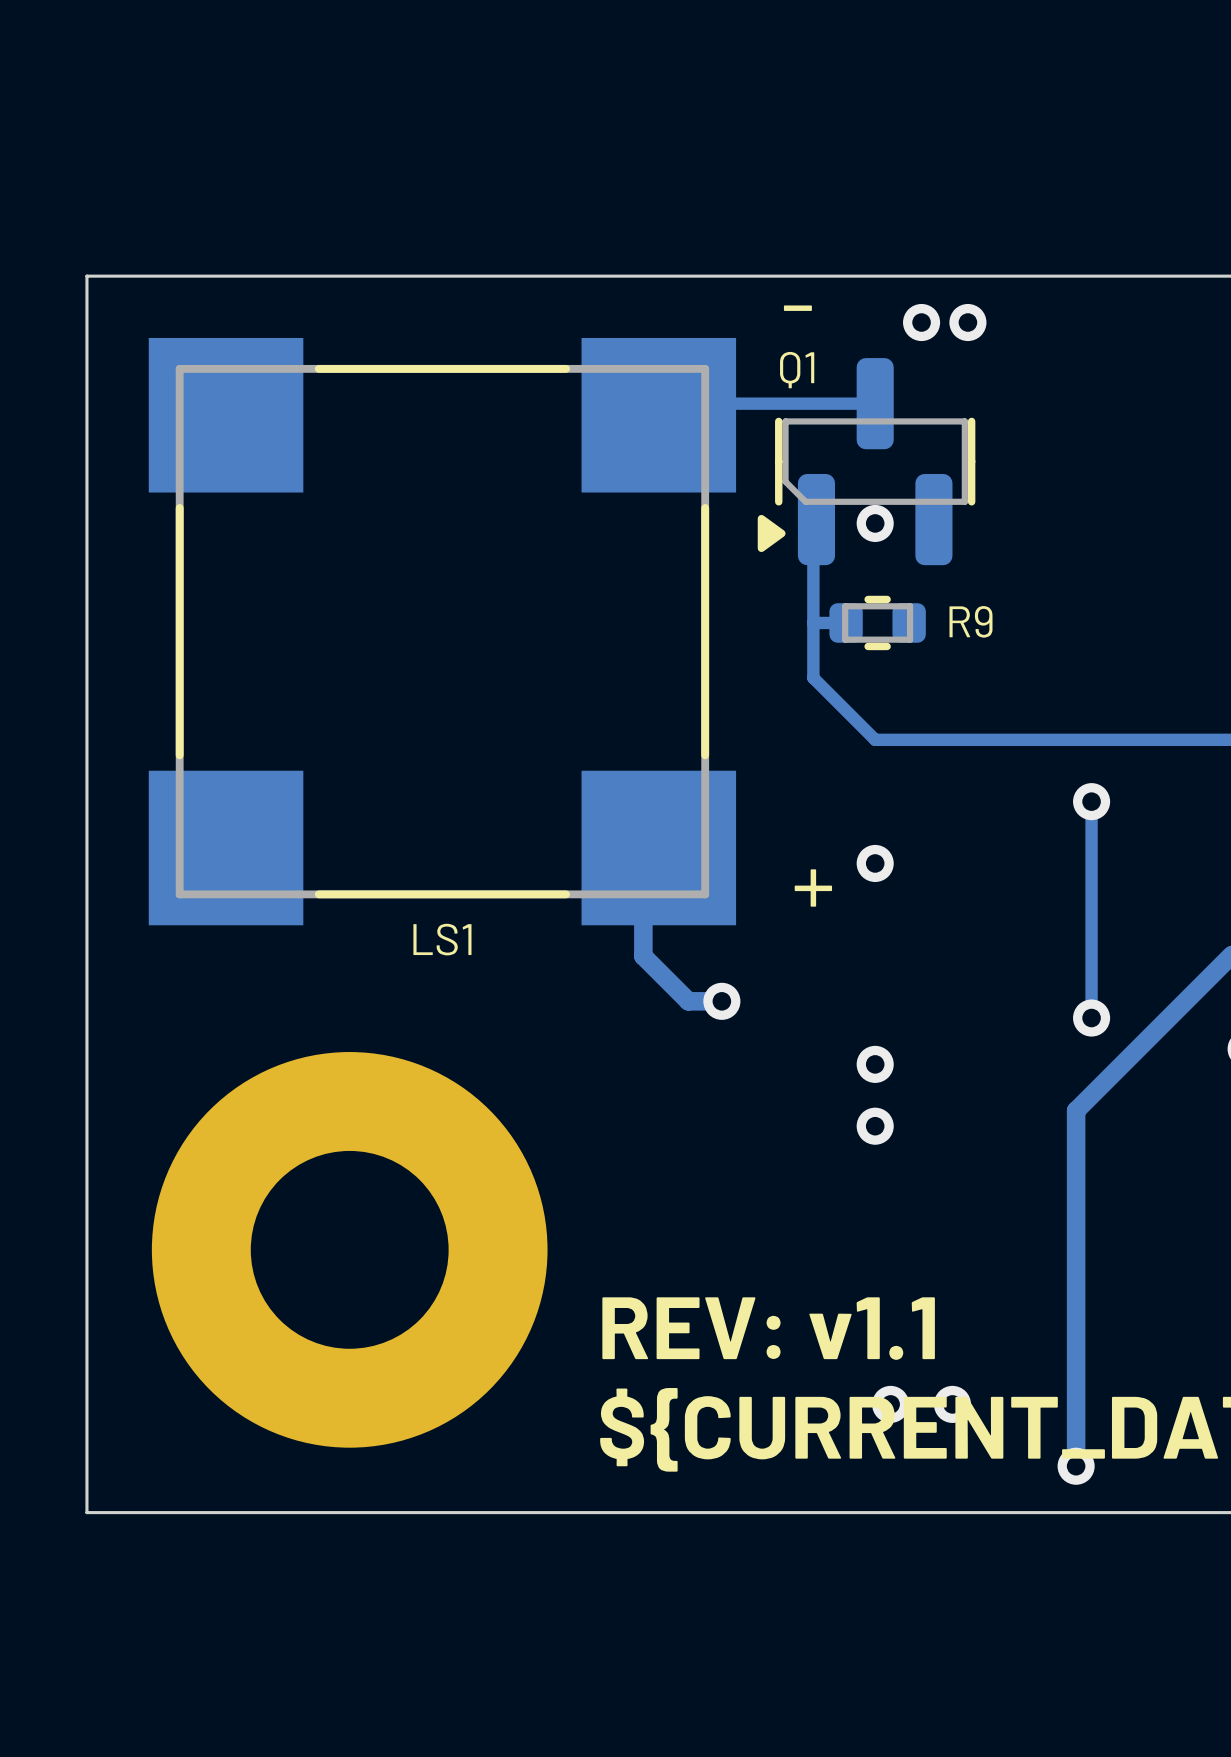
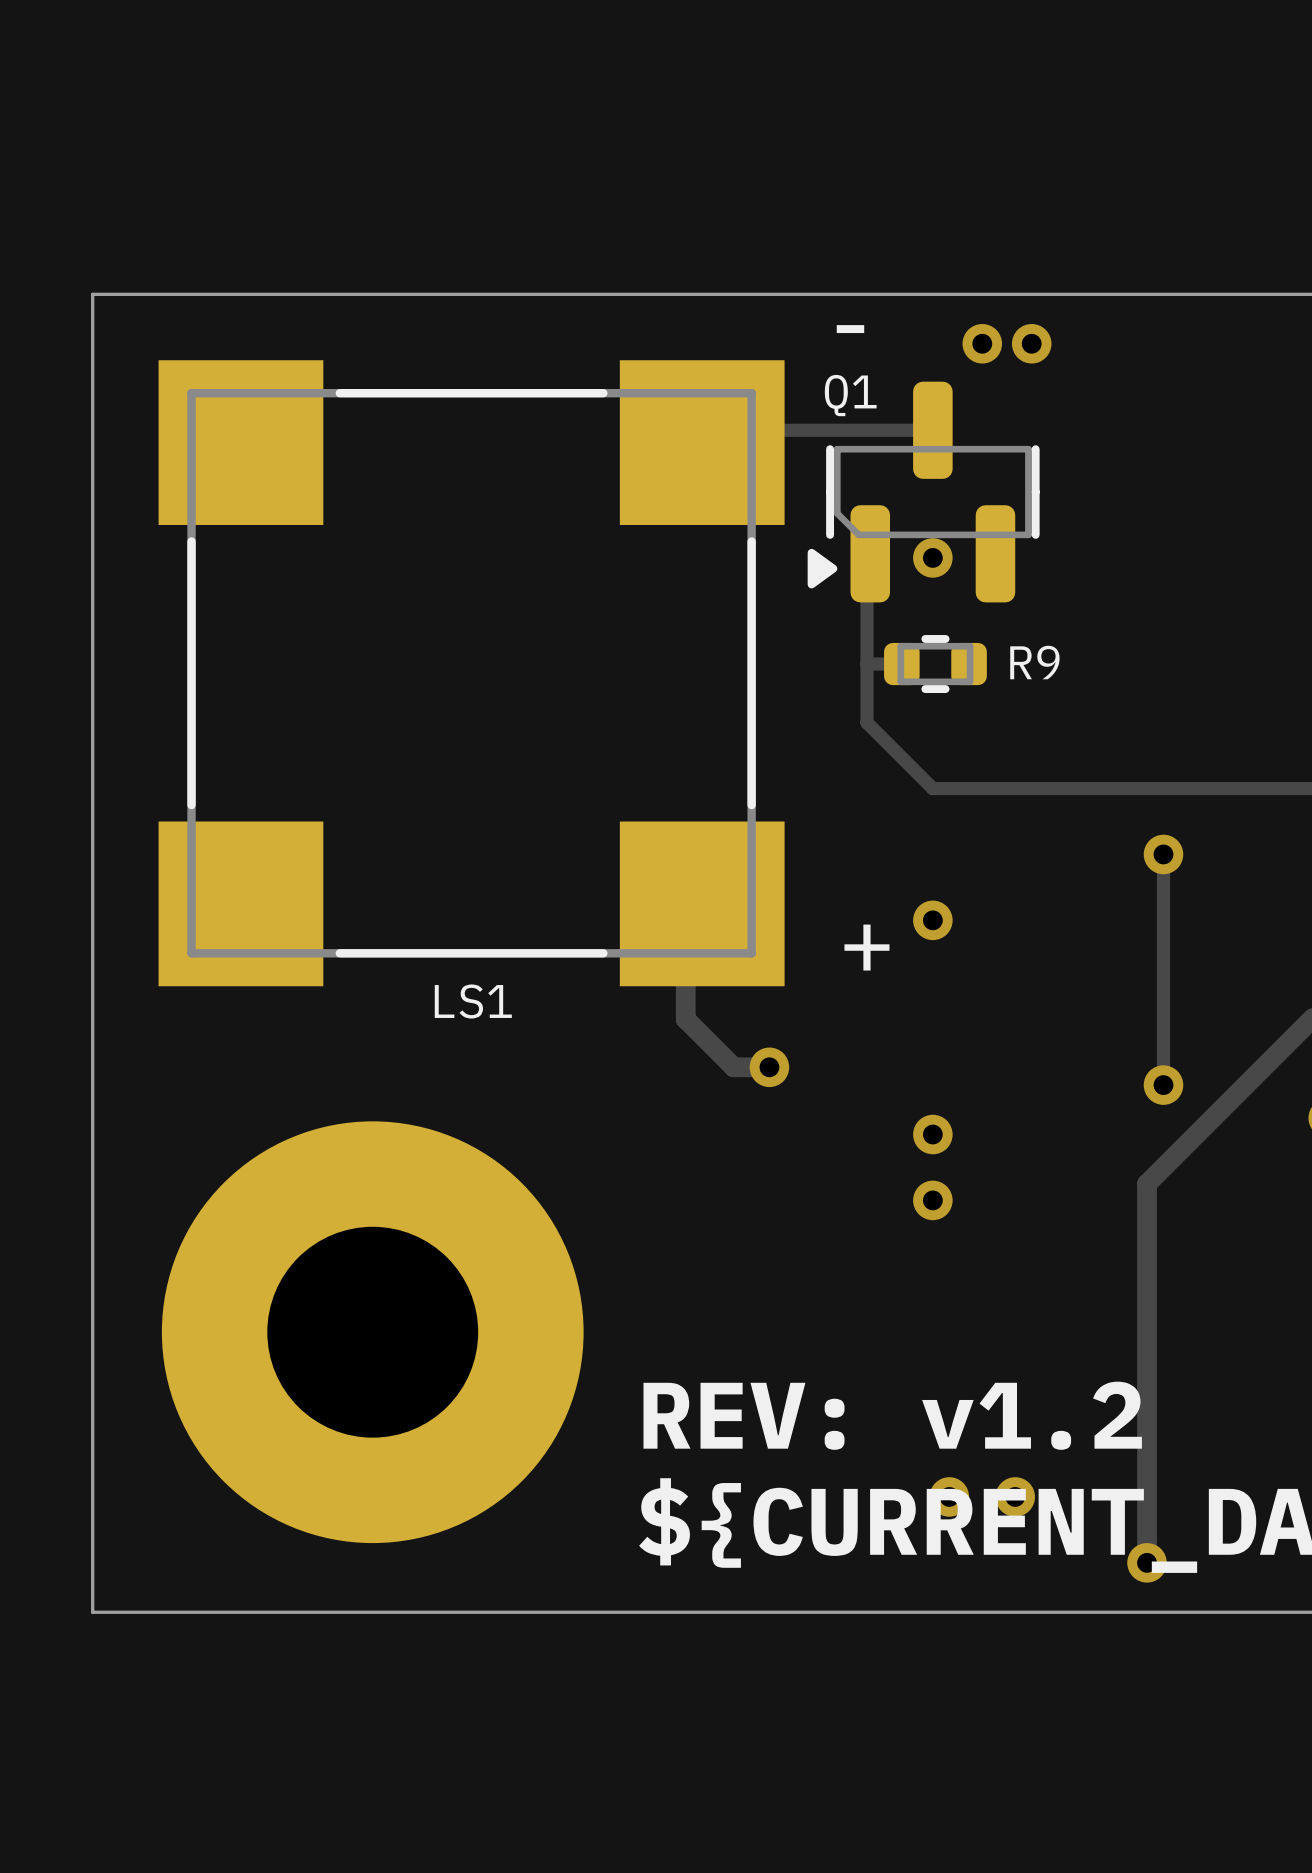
text: REV: v1.1 (768, 1328) -> REV: v1.2 (892, 1415)

